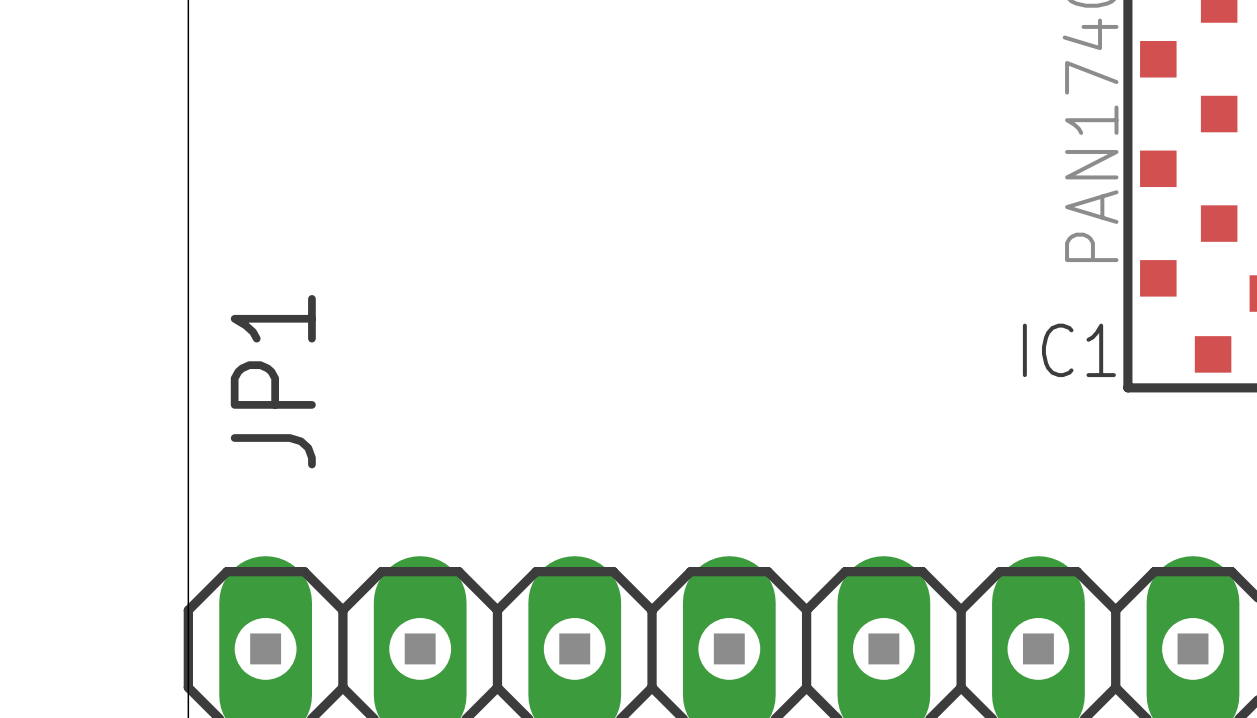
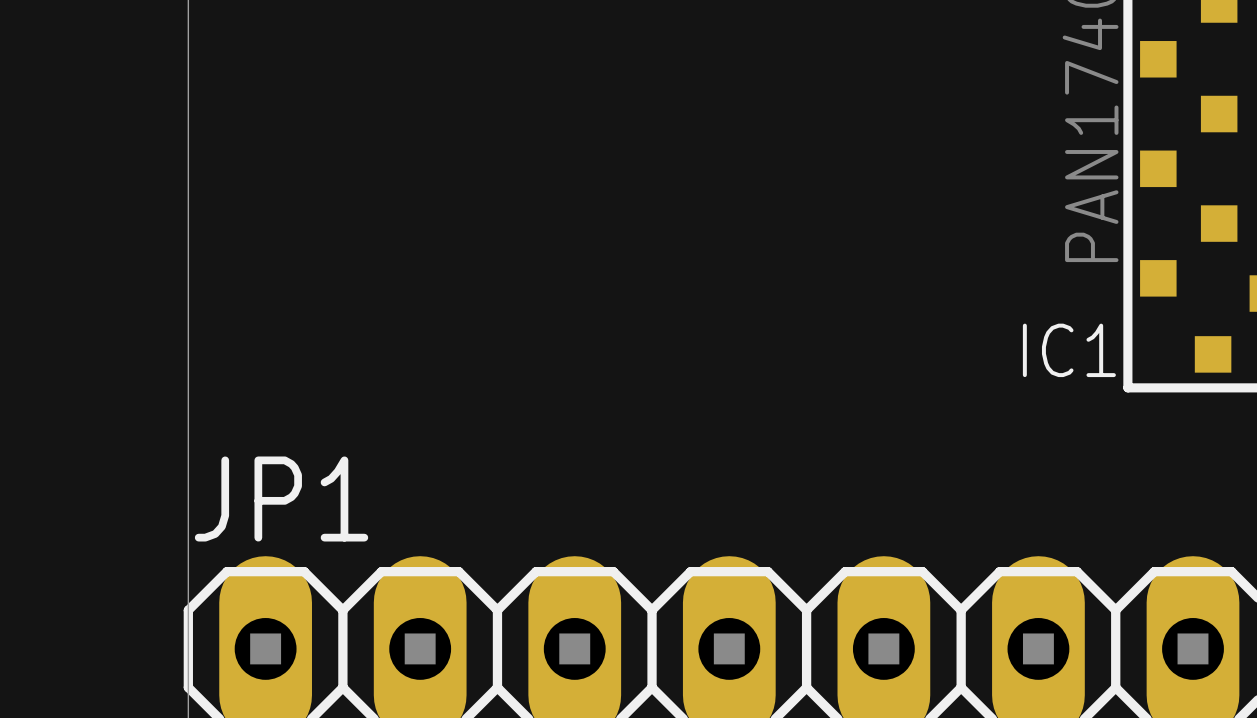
JP1 name rotation: 0° (273, 381) -> 90° clockwise (281, 498)

